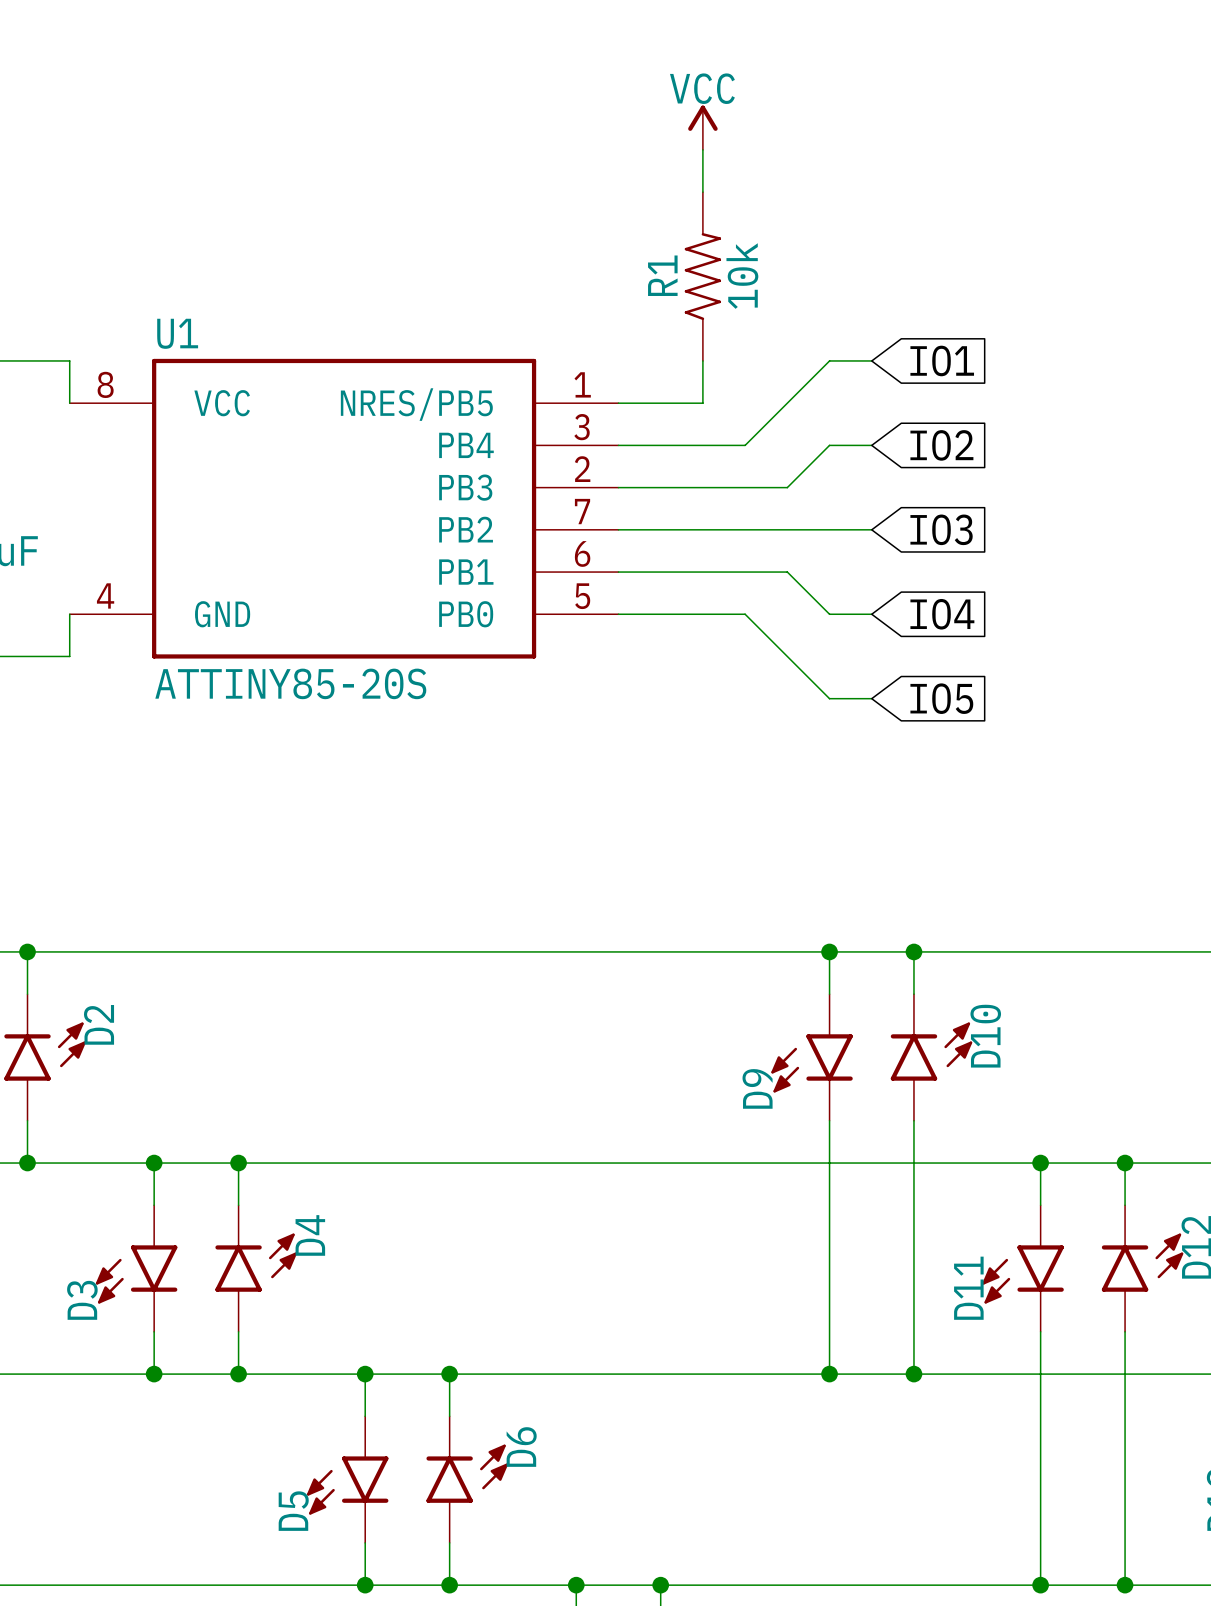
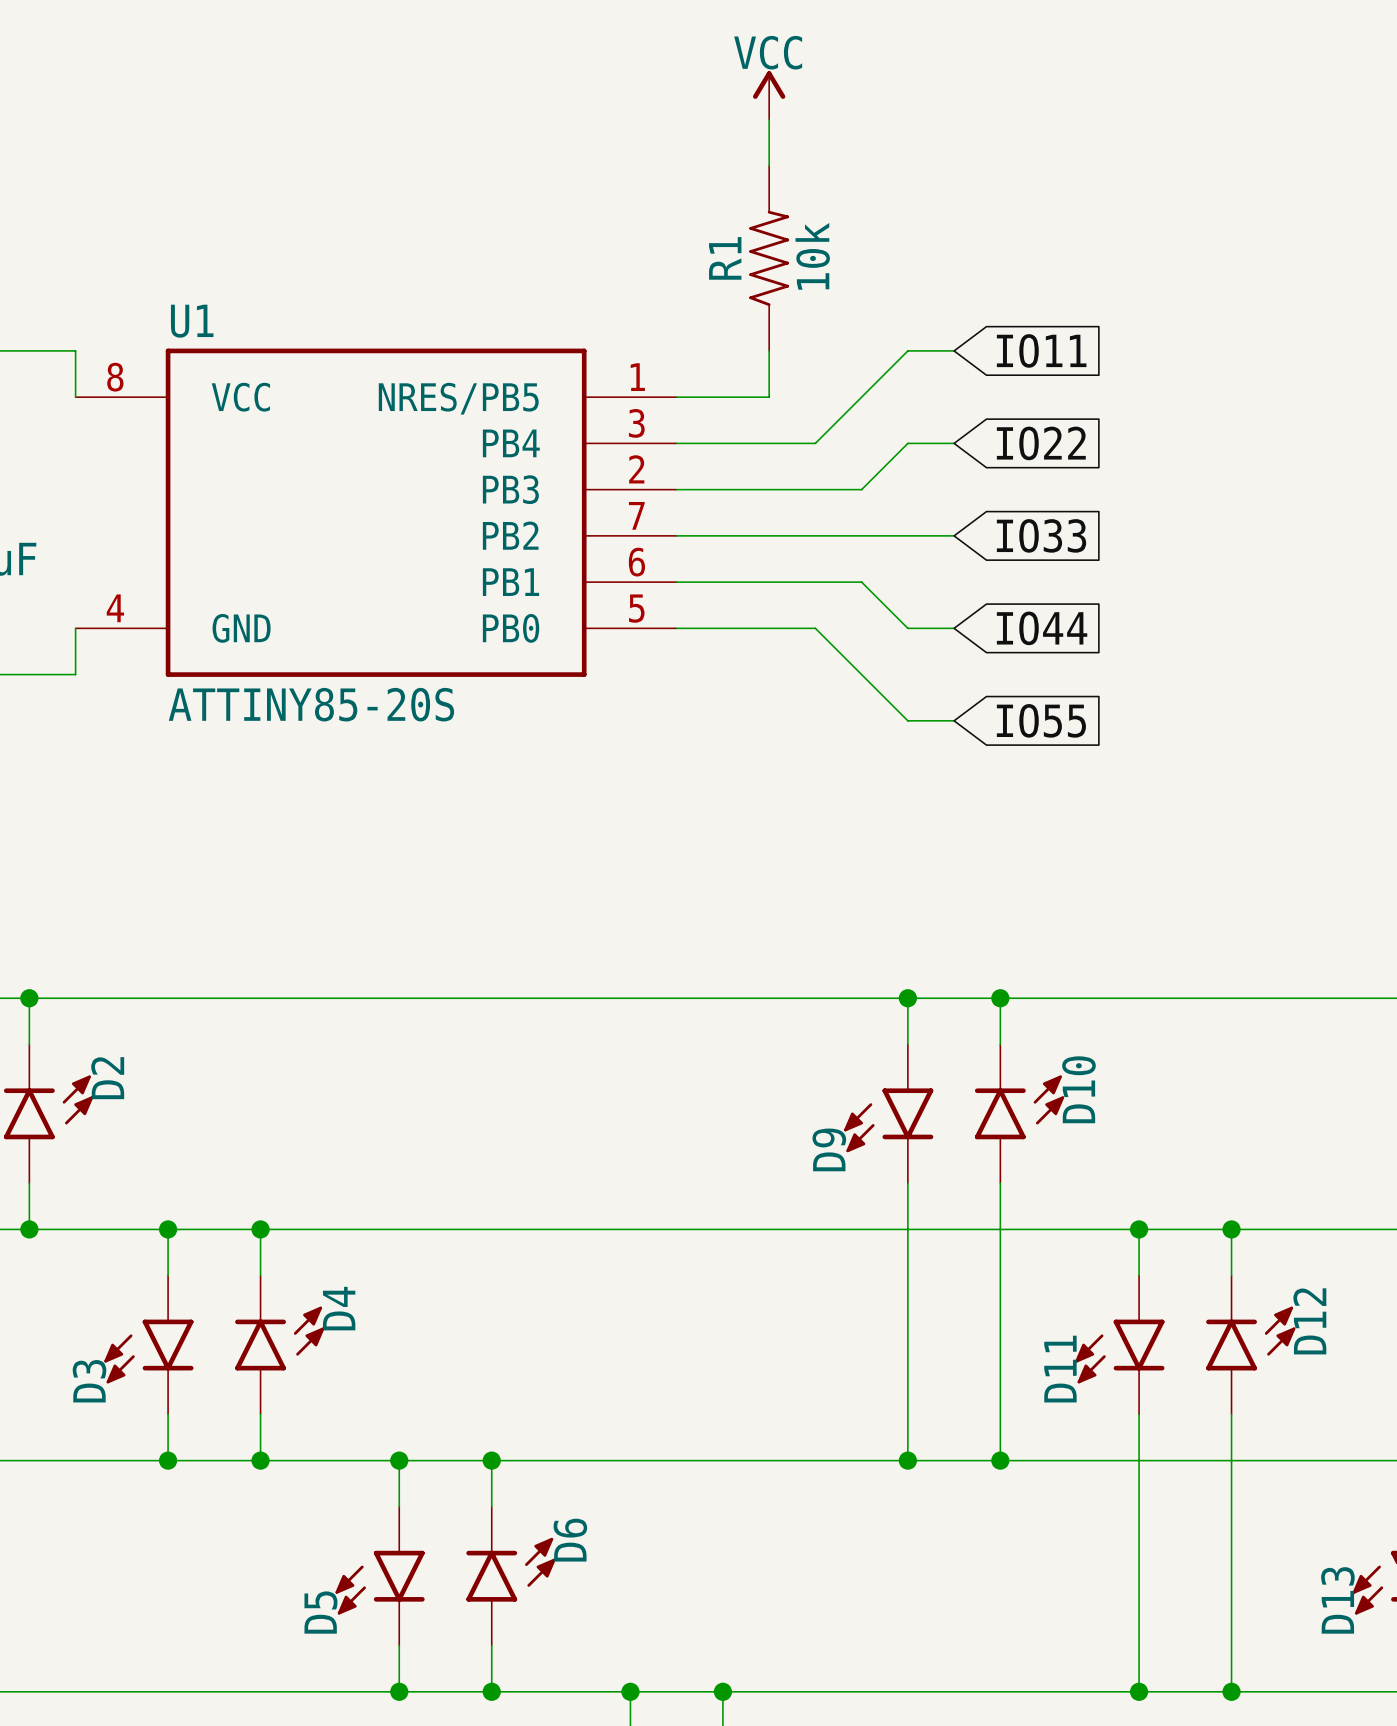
global label: IO1 (942, 360) -> IO11 (1041, 350)
global label: IO2 (941, 445) -> IO22 (1041, 443)
global label: IO3 (941, 529) -> IO33 (1041, 535)
global label: IO4 (942, 614) -> IO44 (1042, 628)
global label: IO5 (941, 698) -> IO55 (1041, 720)

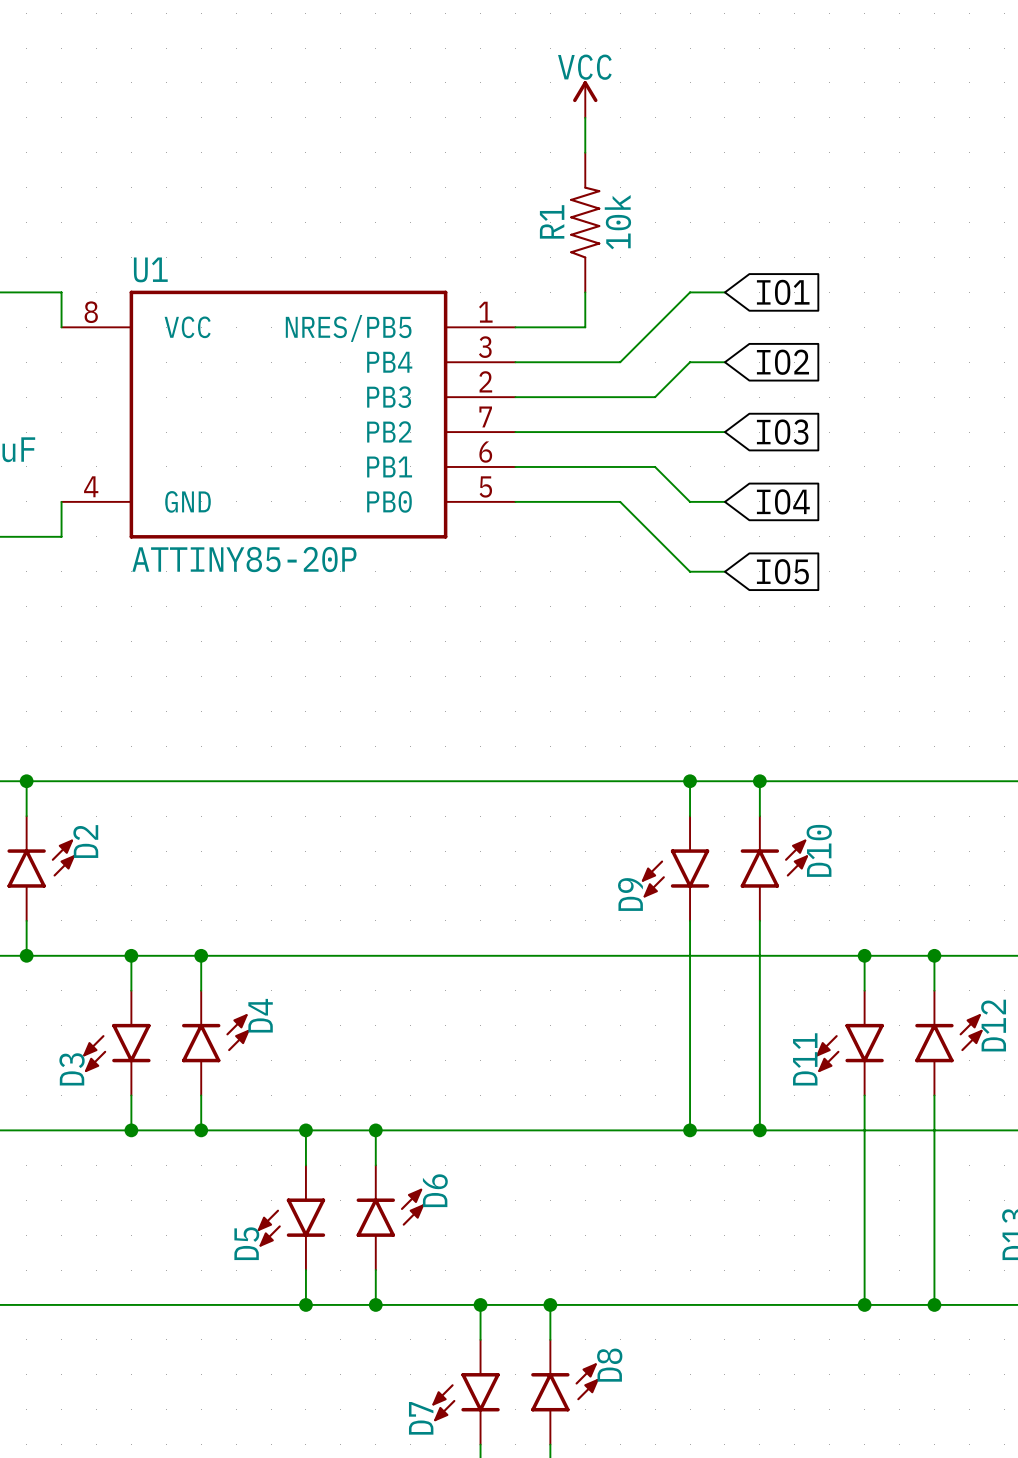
global label: IO11 (1041, 350) -> IO1 (783, 292)
global label: IO22 (1041, 443) -> IO2 (782, 362)
global label: IO33 (1041, 535) -> IO3 (782, 432)
global label: IO44 (1042, 628) -> IO4 (783, 501)
U1 value: ATTINY85-20S (311, 704) -> ATTINY85-20P (244, 559)
global label: IO55 (1041, 720) -> IO5 (782, 571)

